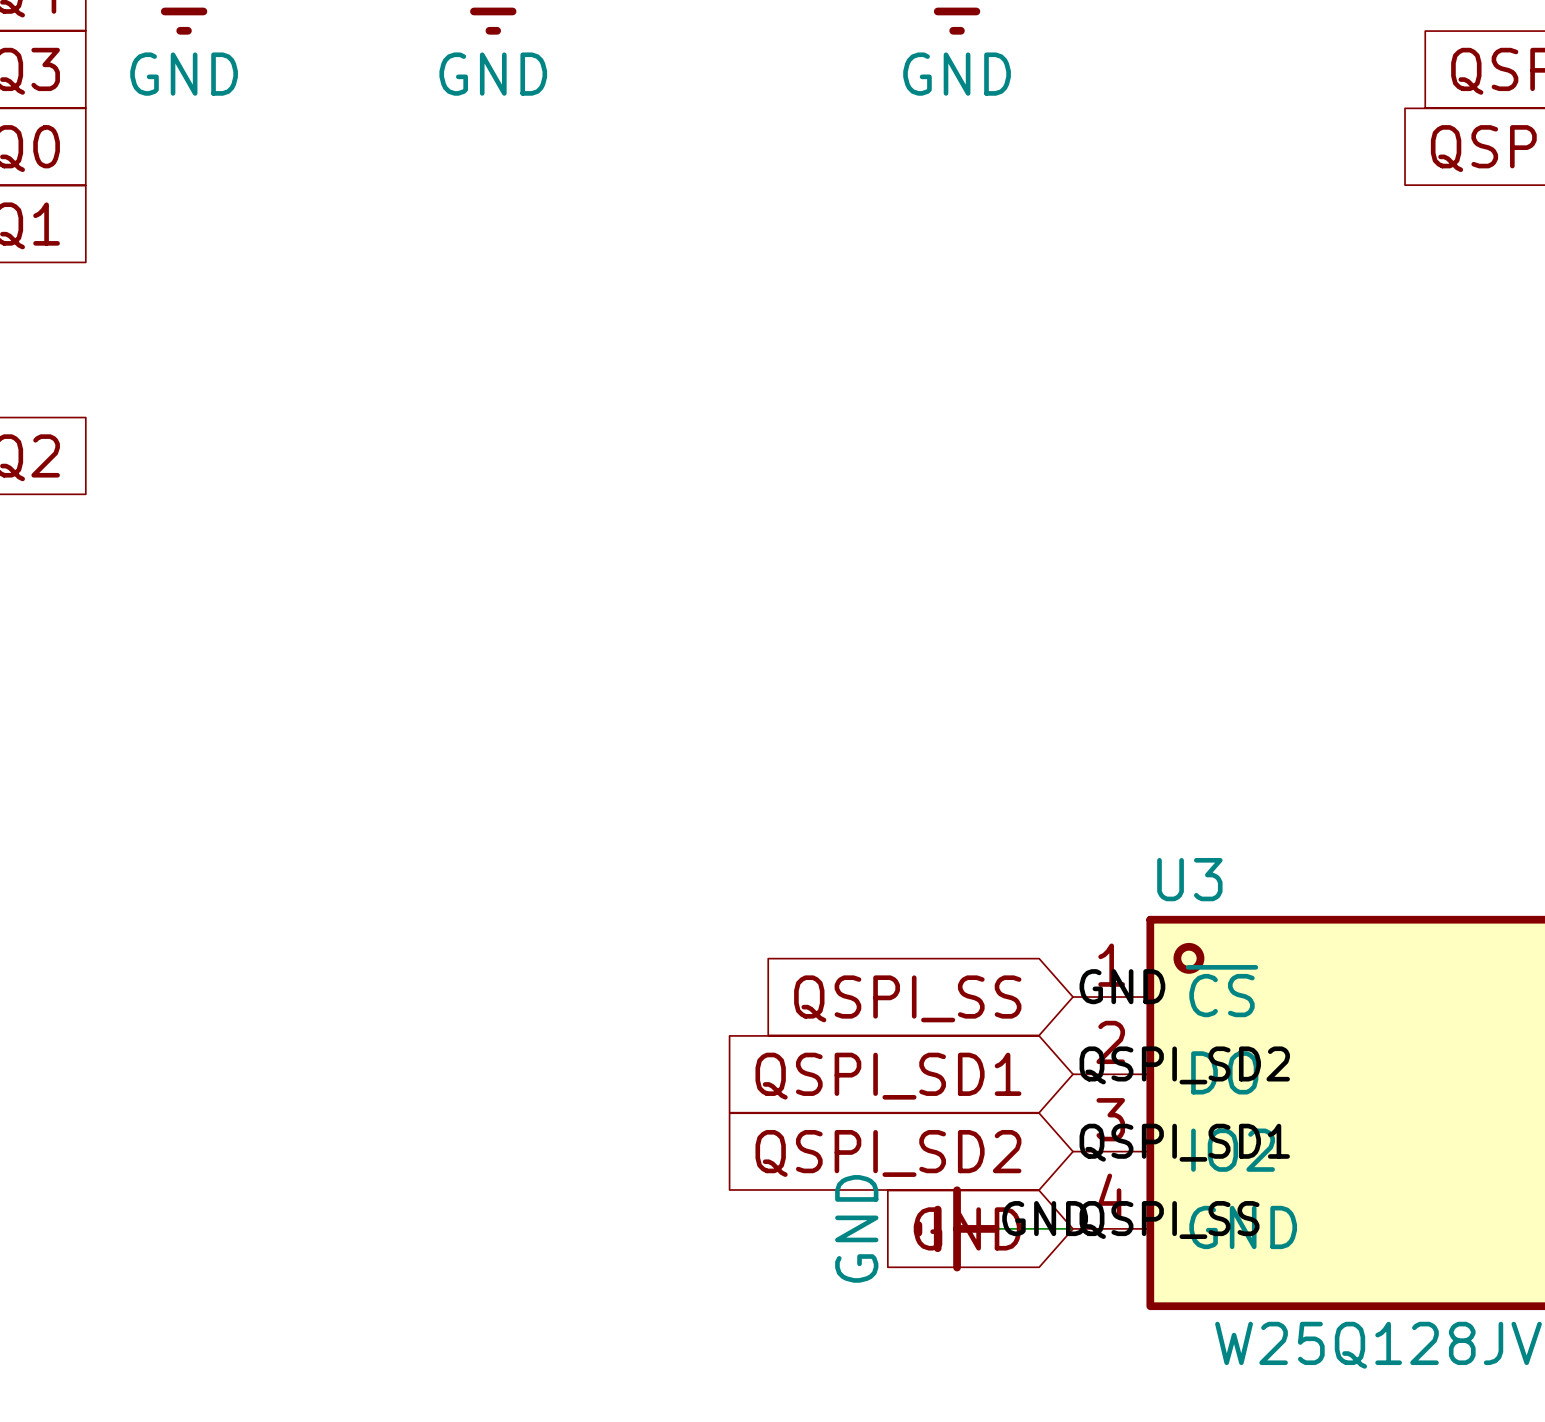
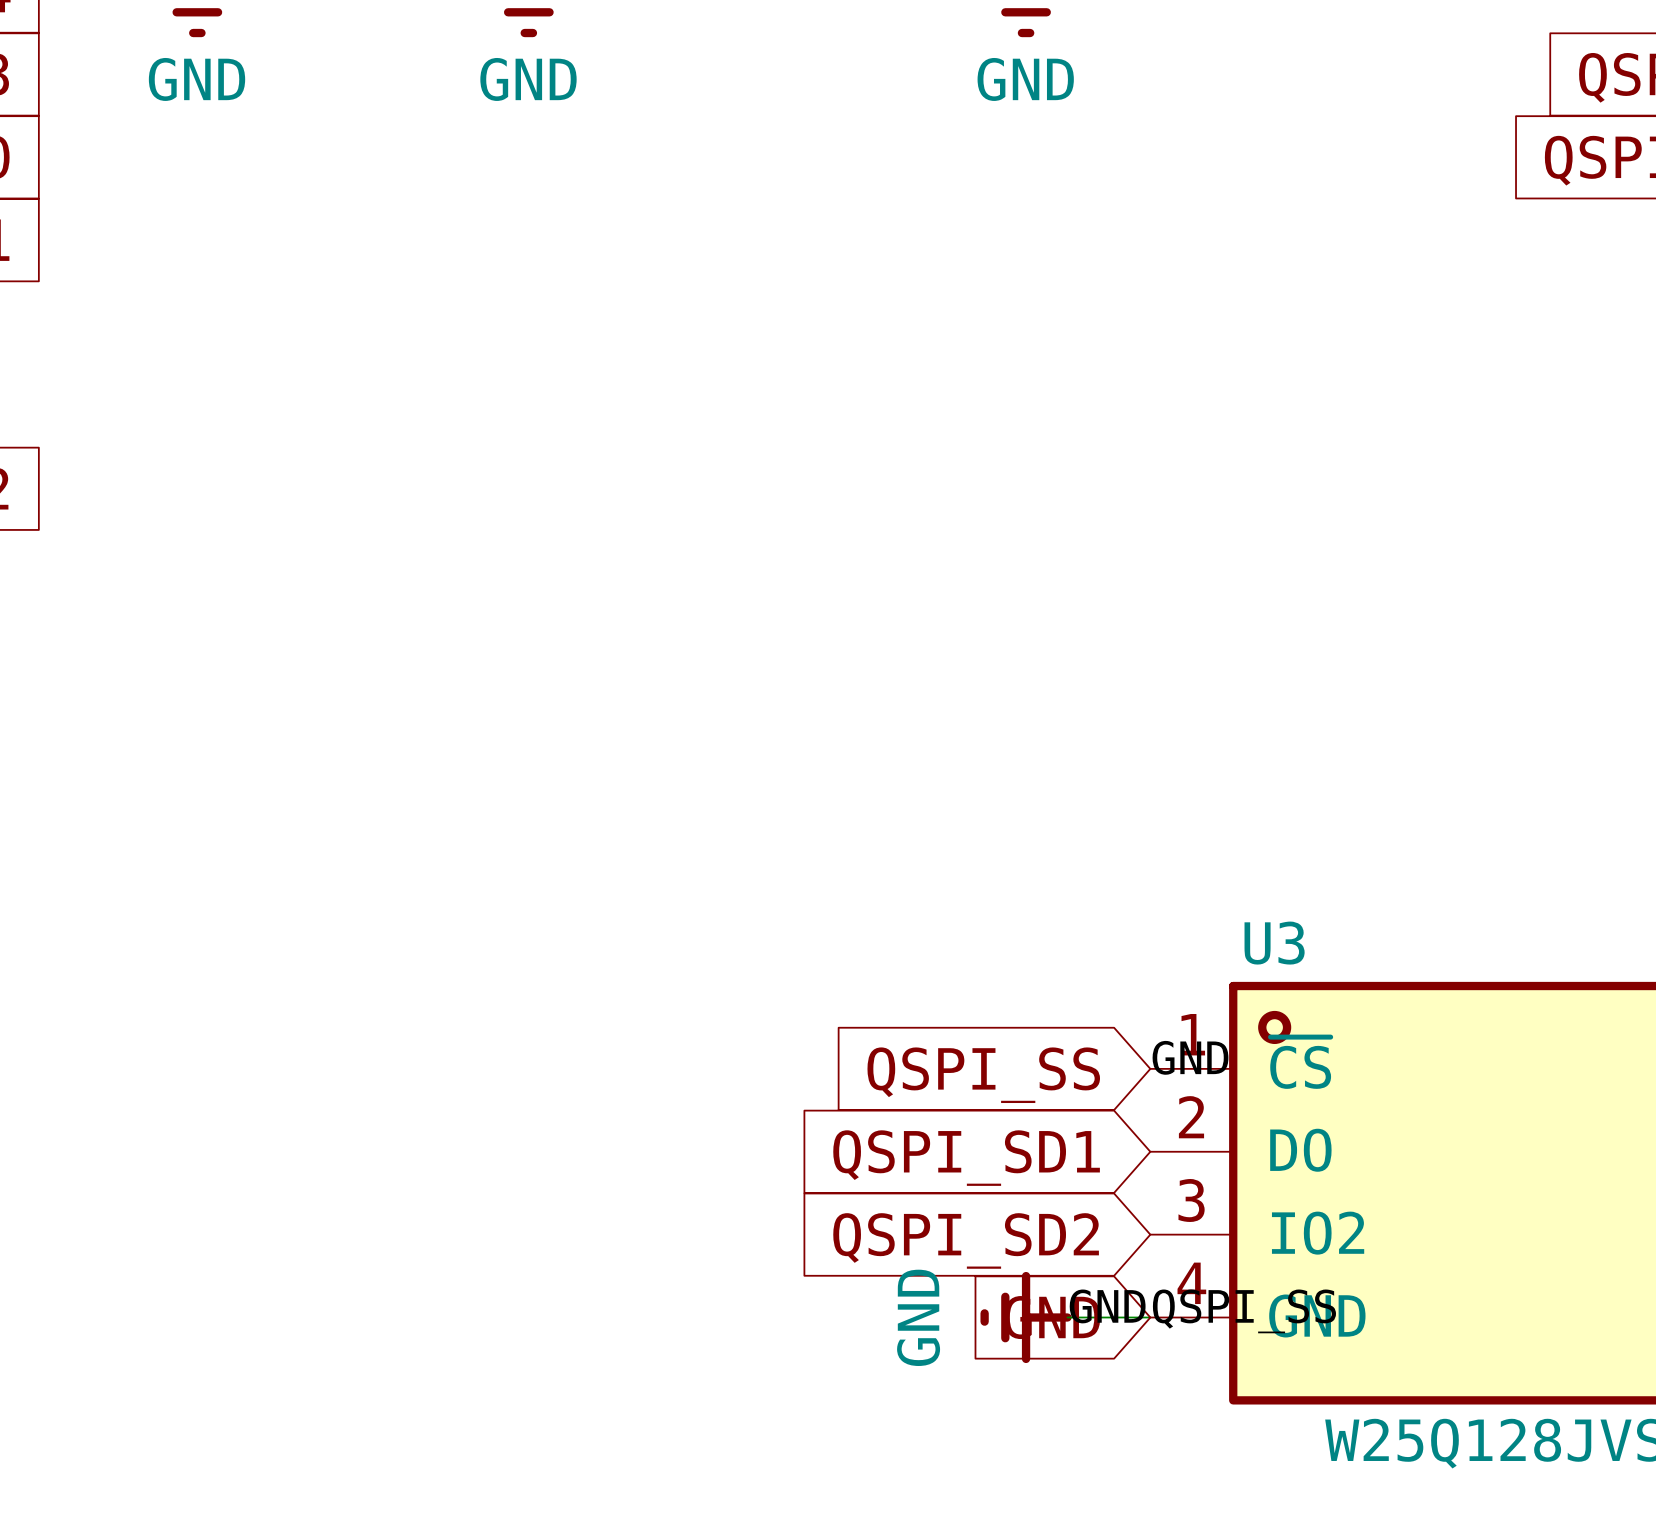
label: QSPI_SD2 (1184, 1065) -> none
label: QSPI_SD1 (1184, 1142) -> none

